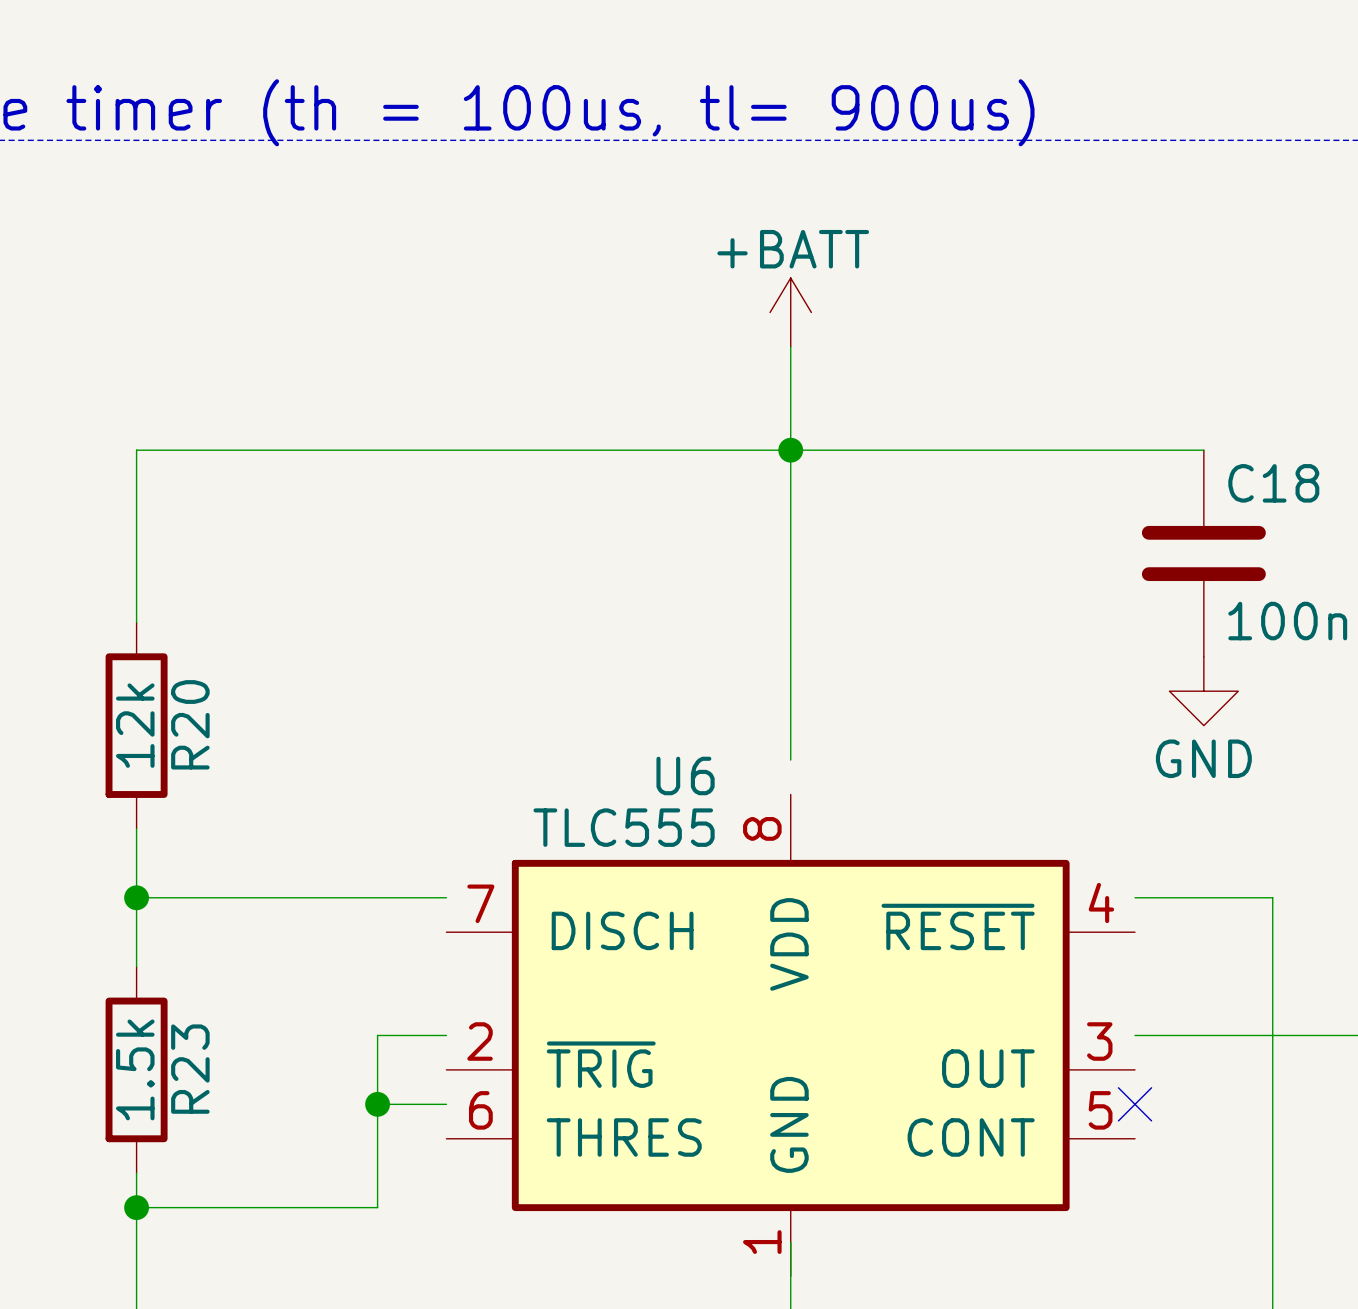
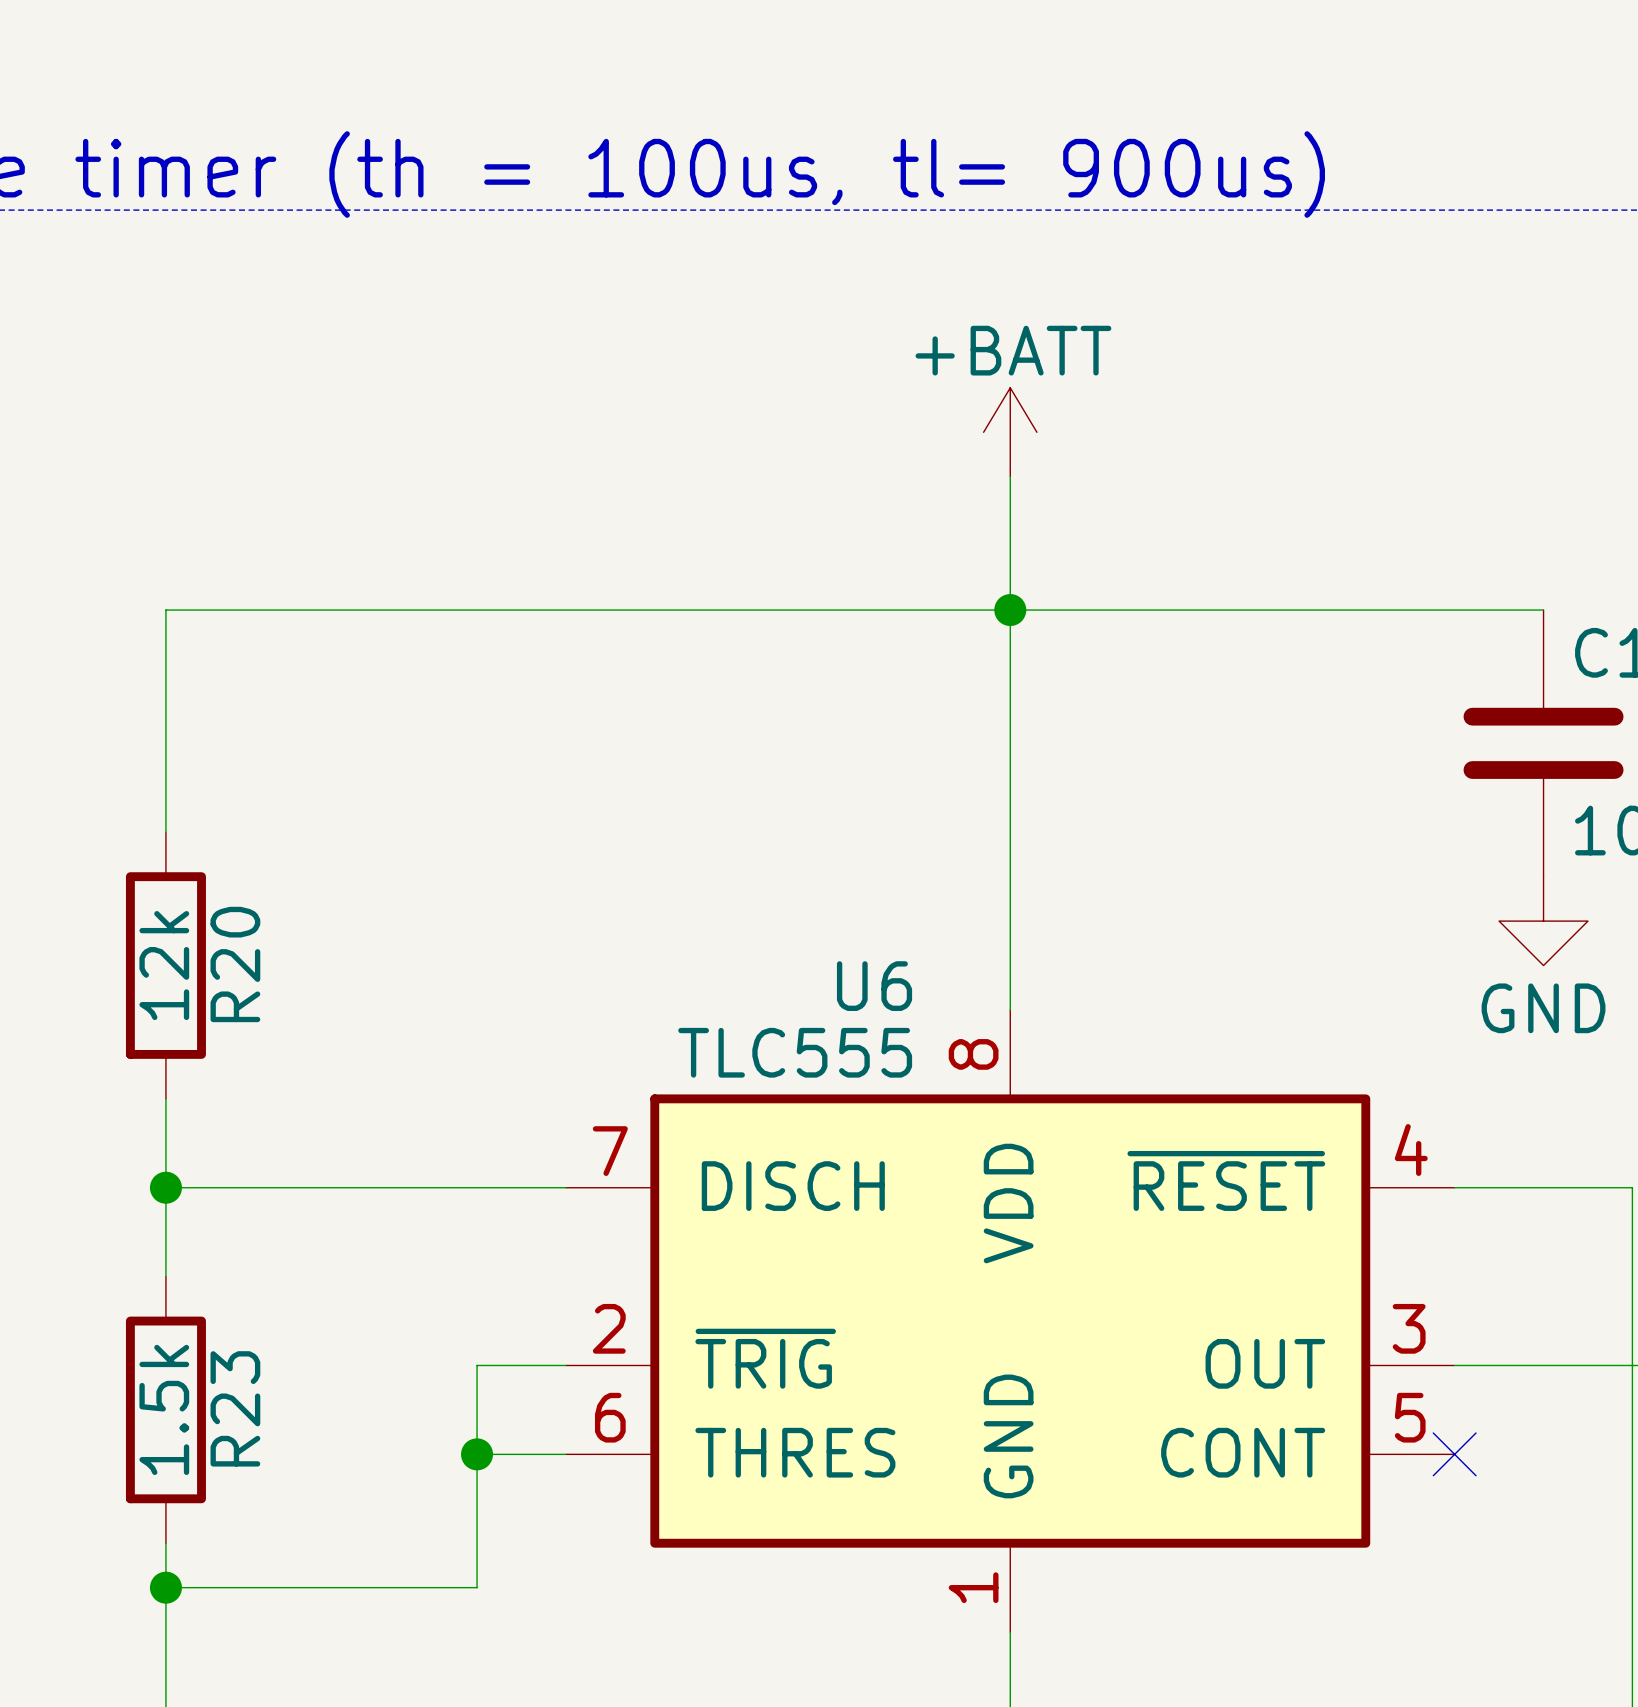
U6 position: (790, 1035) -> (1010, 1321)

